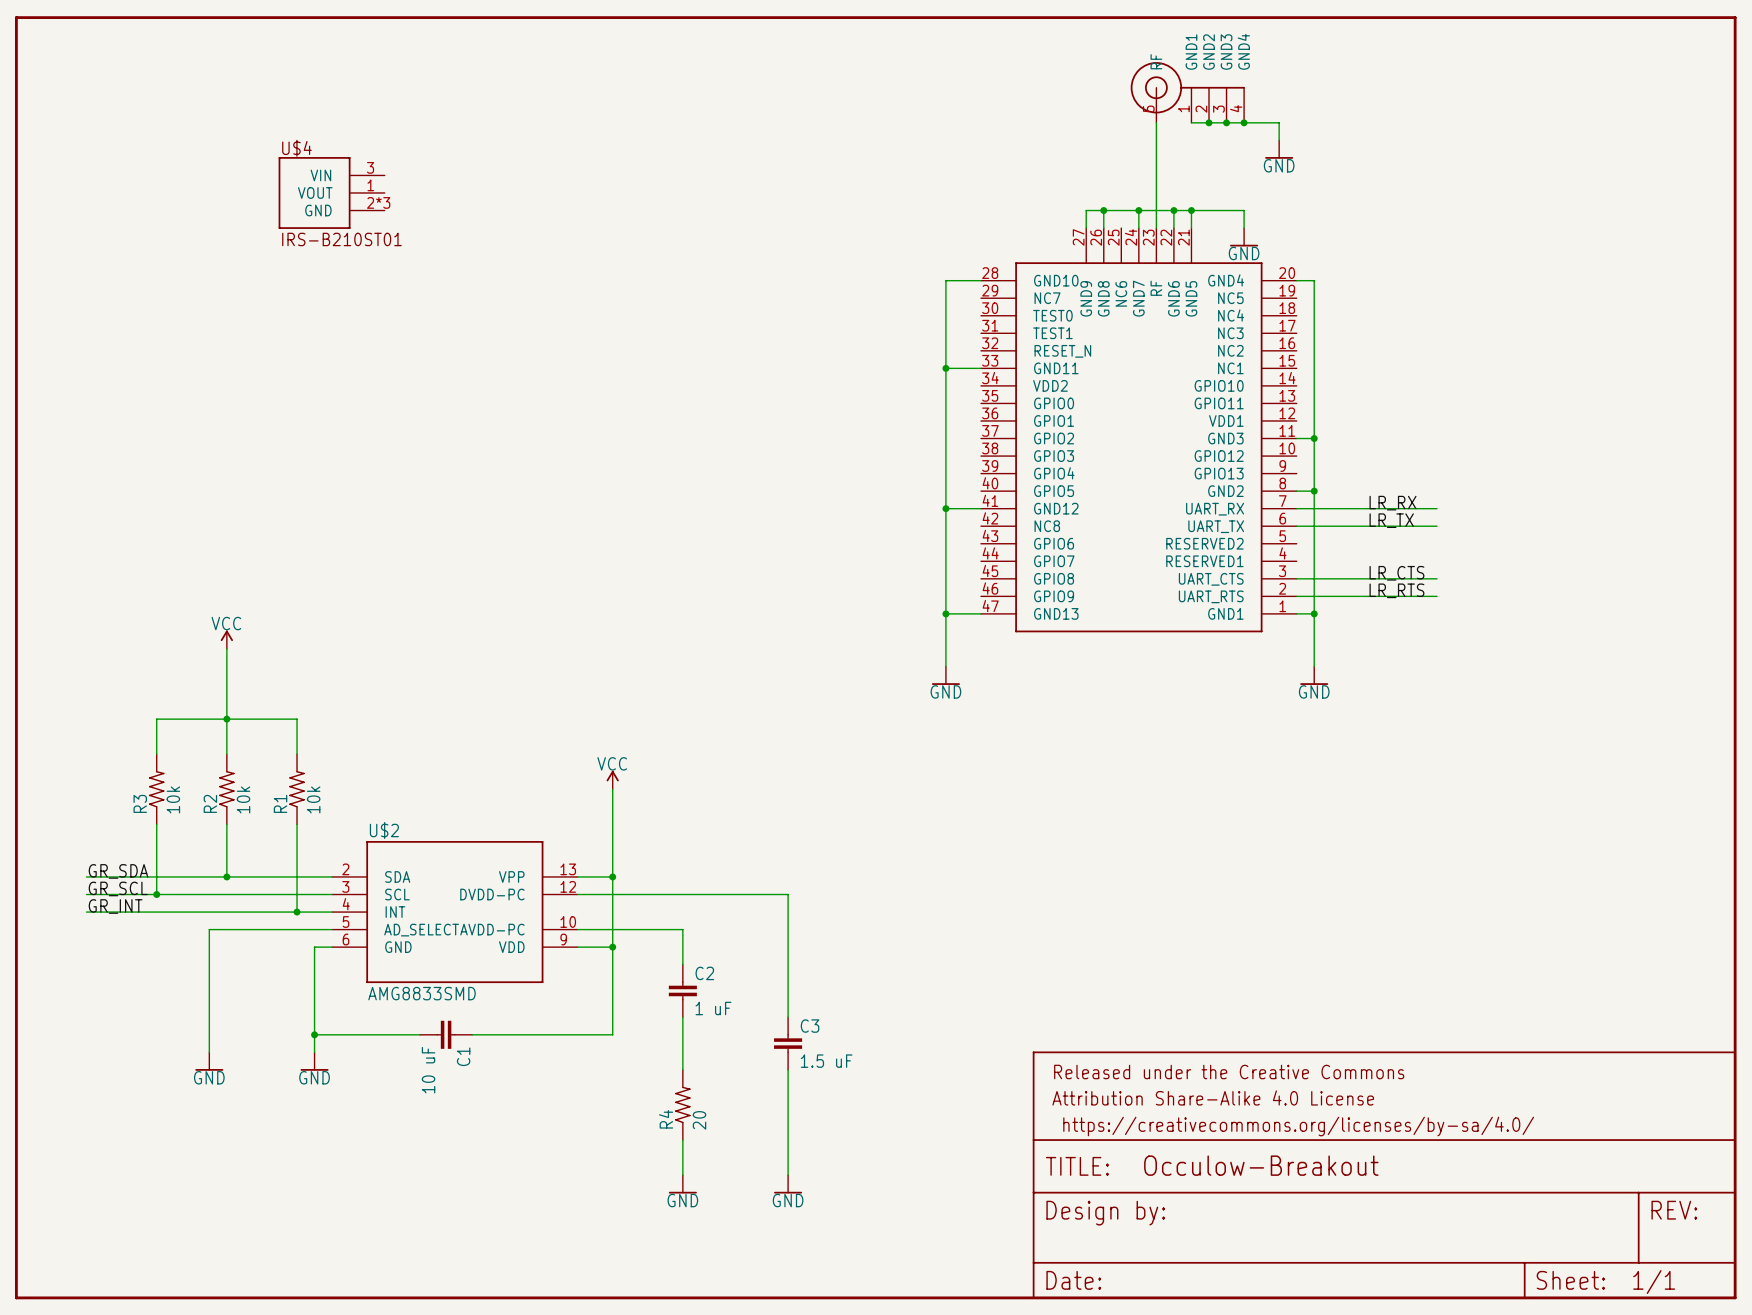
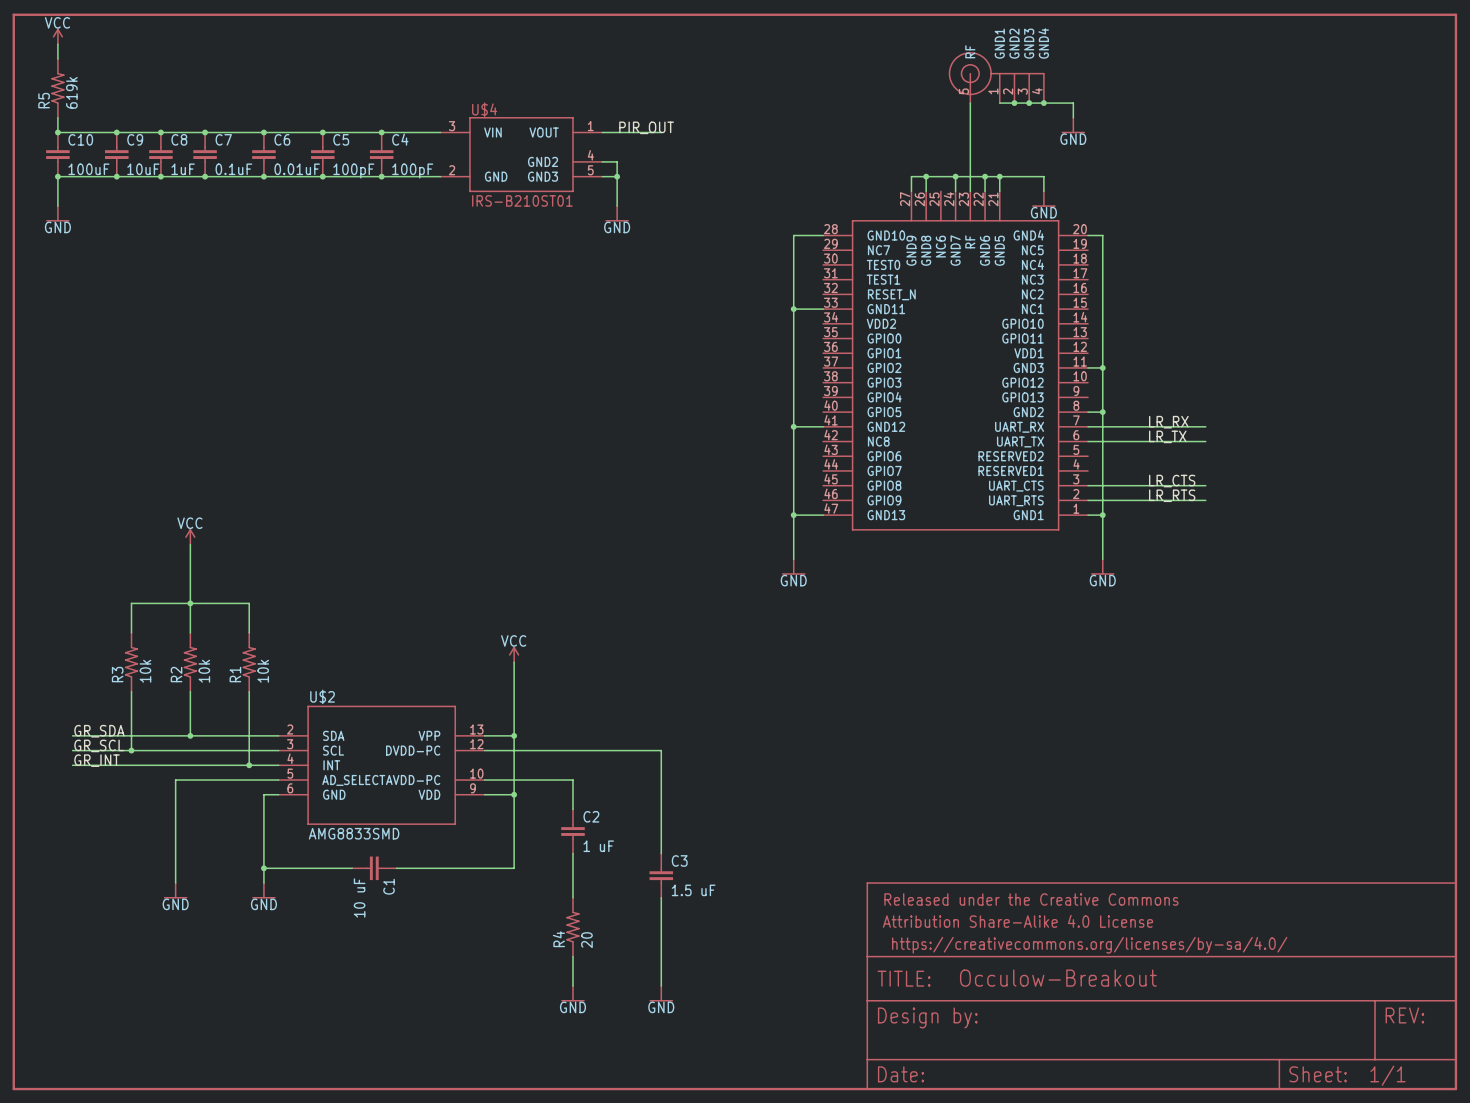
power symbol: none -> VCC (57, 36)
wire: none -> (57, 44) (57, 58)
R5: none -> 619k (57, 88)
wire: none -> (57, 117) (57, 132) (440, 132)
label: none -> PIR_OUT (646, 127)
junction: none -> (57, 132)
junction: none -> (116, 132)
junction: none -> (160, 132)
junction: none -> (205, 132)
U$4 symbol: [278, 157, 385, 229] -> [440, 117, 603, 193]
junction: none -> (263, 132)
junction: none -> (322, 132)
junction: none -> (381, 132)
wire: none -> (602, 132) (661, 132)
C10: none -> 100uF (57, 154)
C9: none -> 10uF (116, 154)
C8: none -> 1uF (160, 154)
C7: none -> 0.1uF (205, 154)
C6: none -> 0.01uF (263, 154)
C5: none -> 100pF (322, 154)
C4: none -> 100pF (381, 154)
wire: none -> (602, 161) (617, 161) (617, 206)
junction: none -> (57, 176)
junction: none -> (116, 176)
junction: none -> (160, 176)
junction: none -> (205, 176)
junction: none -> (263, 176)
junction: none -> (322, 176)
junction: none -> (381, 176)
wire: none -> (440, 176) (57, 176) (57, 206)
wire: none -> (602, 176) (617, 176)
junction: none -> (617, 176)
power symbol: none -> GND (57, 213)
power symbol: none -> GND (617, 213)

